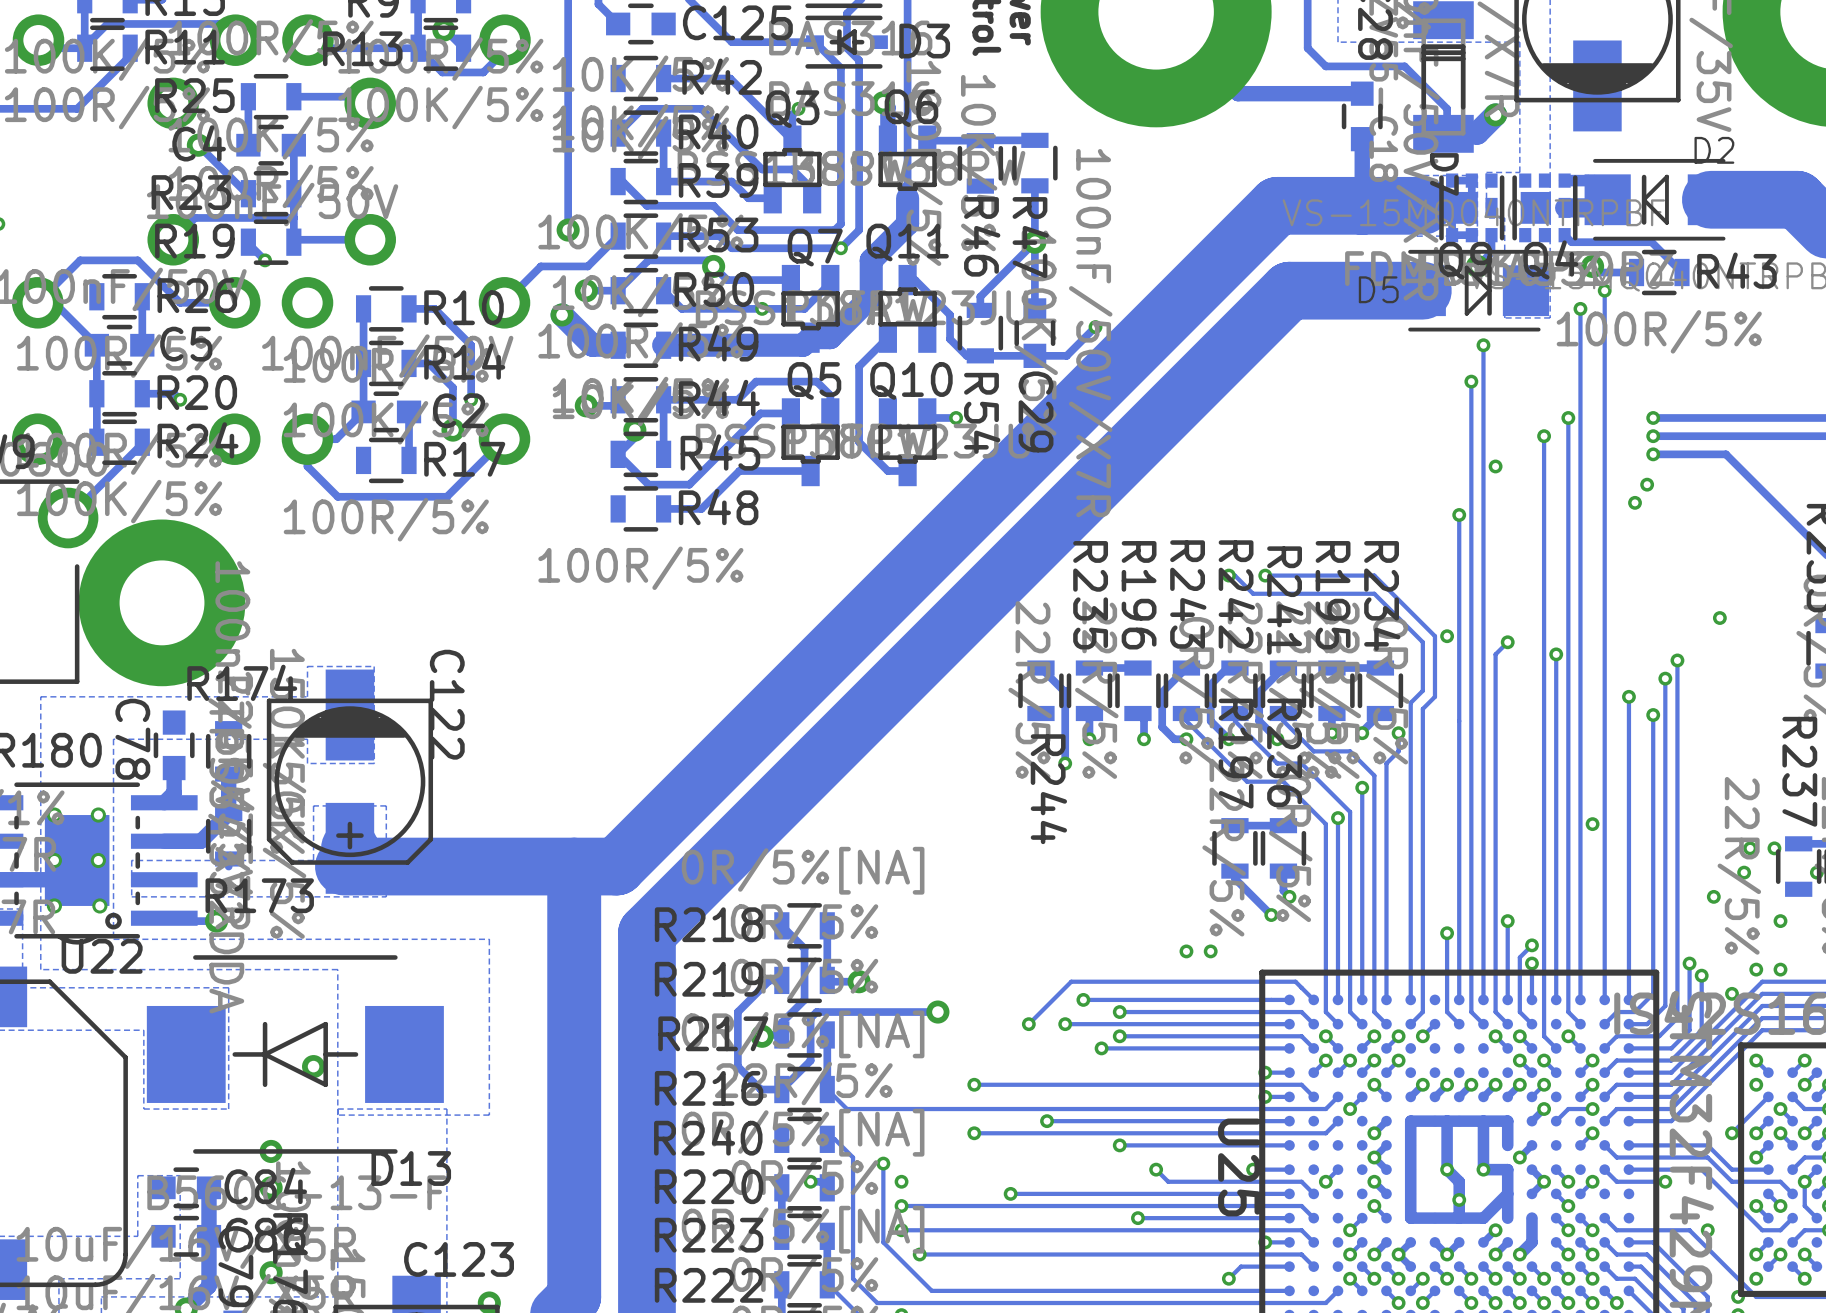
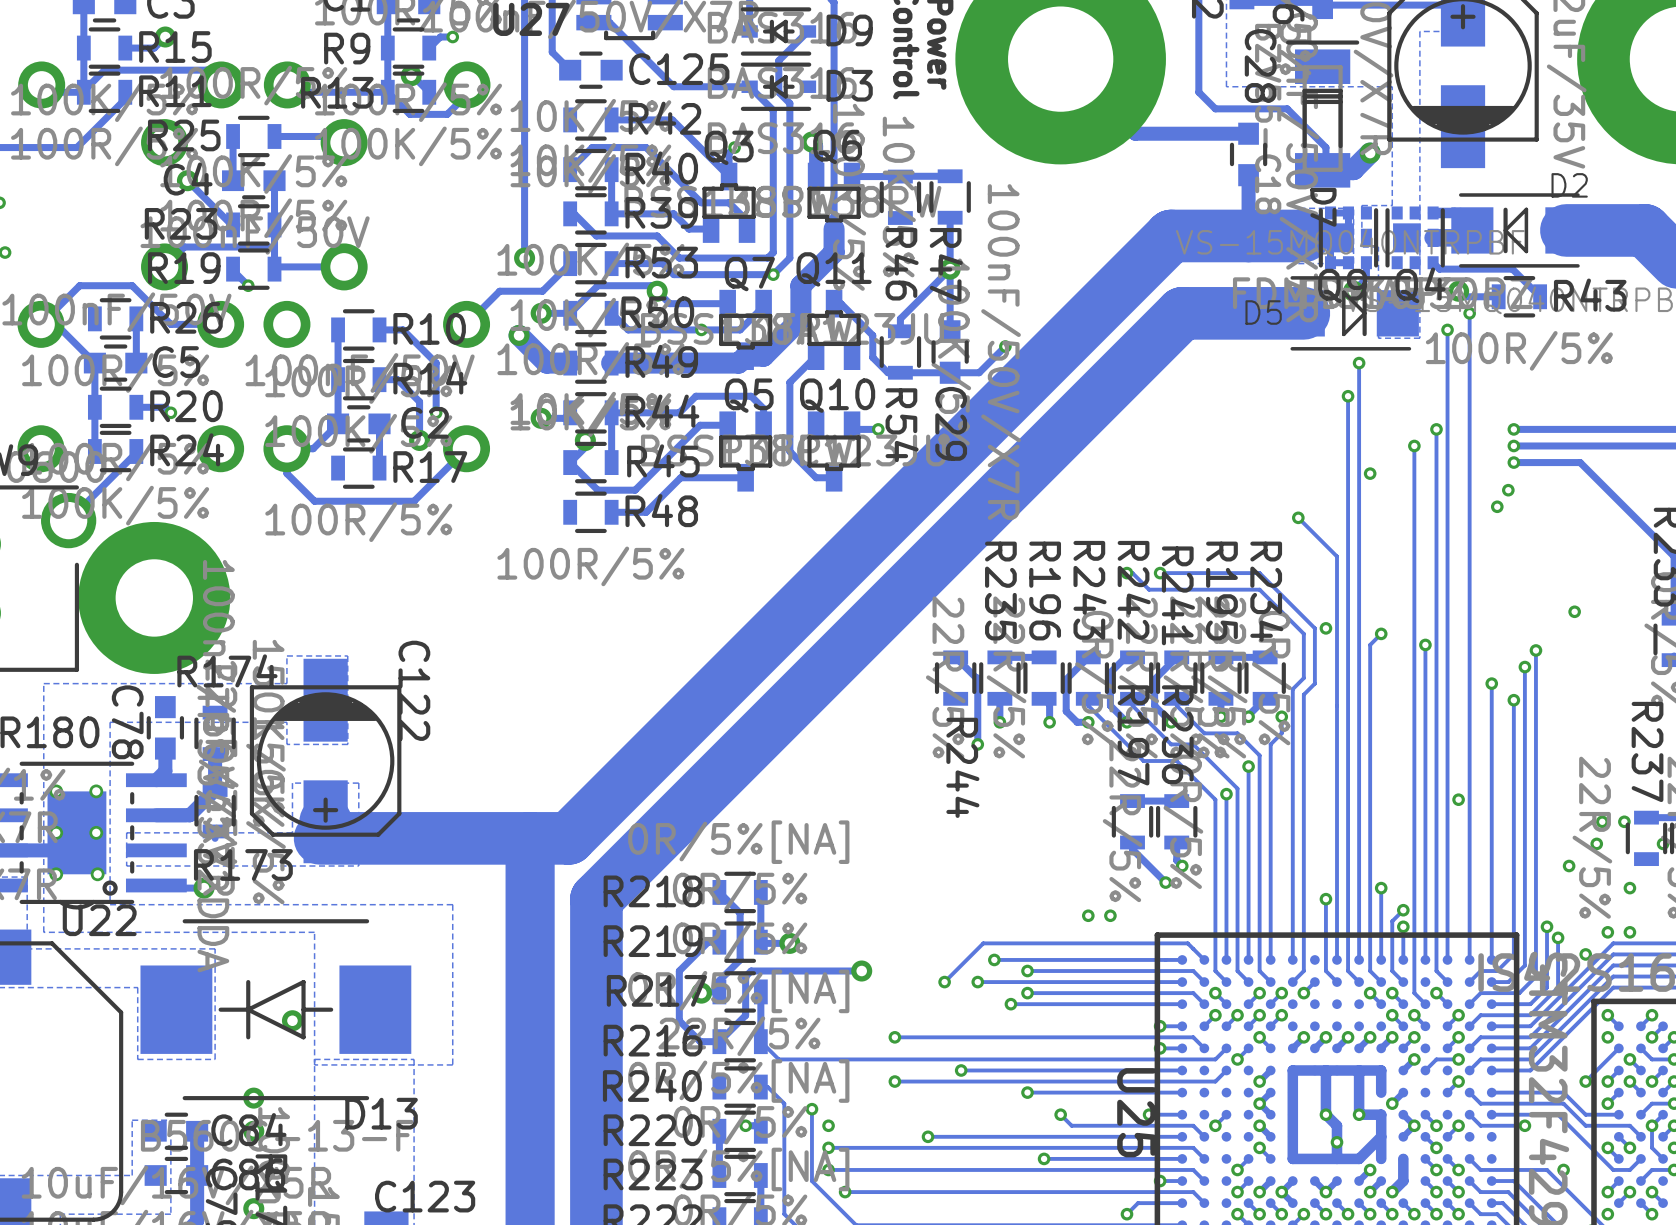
track: (1459, 514) (1459, 557) -> (1298, 517) (1337, 556)
via position: (1459, 514) -> (1298, 517)

